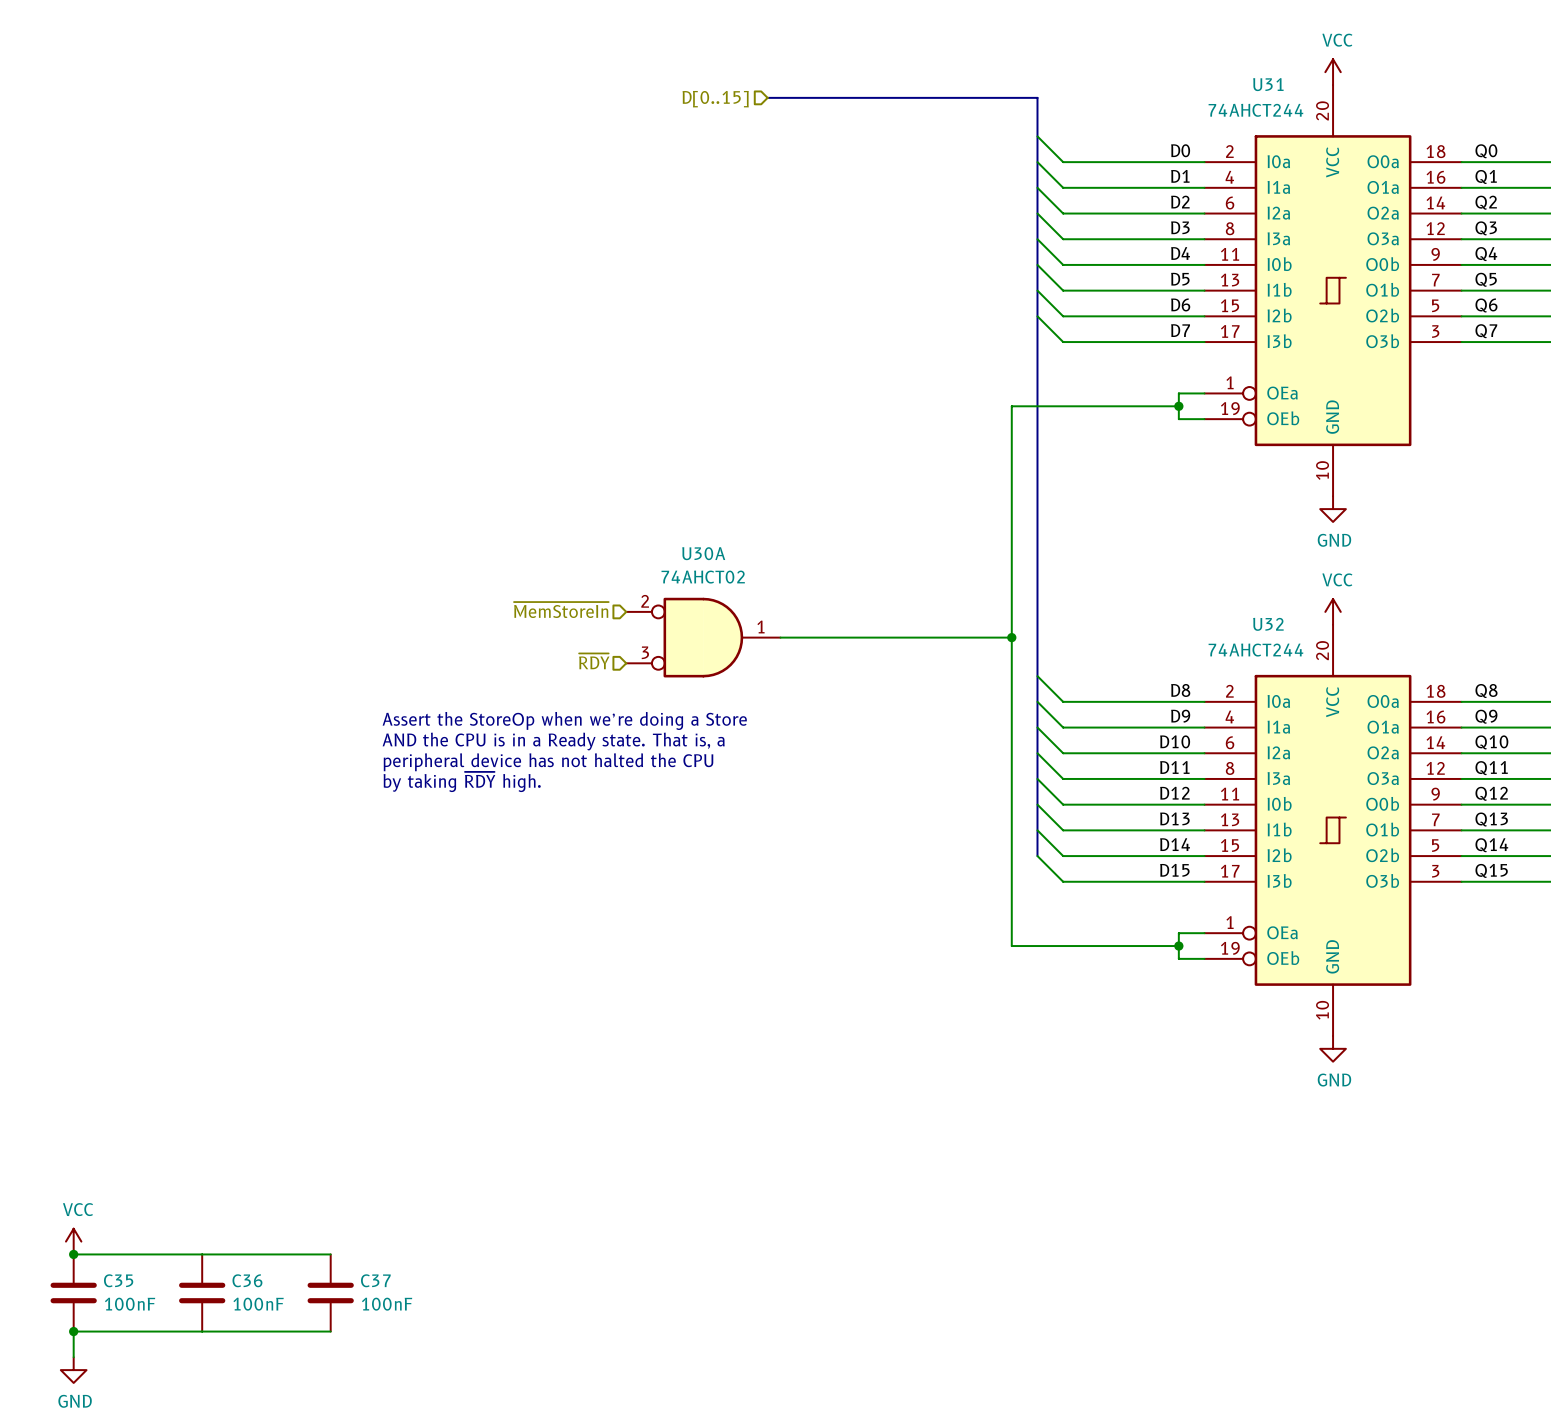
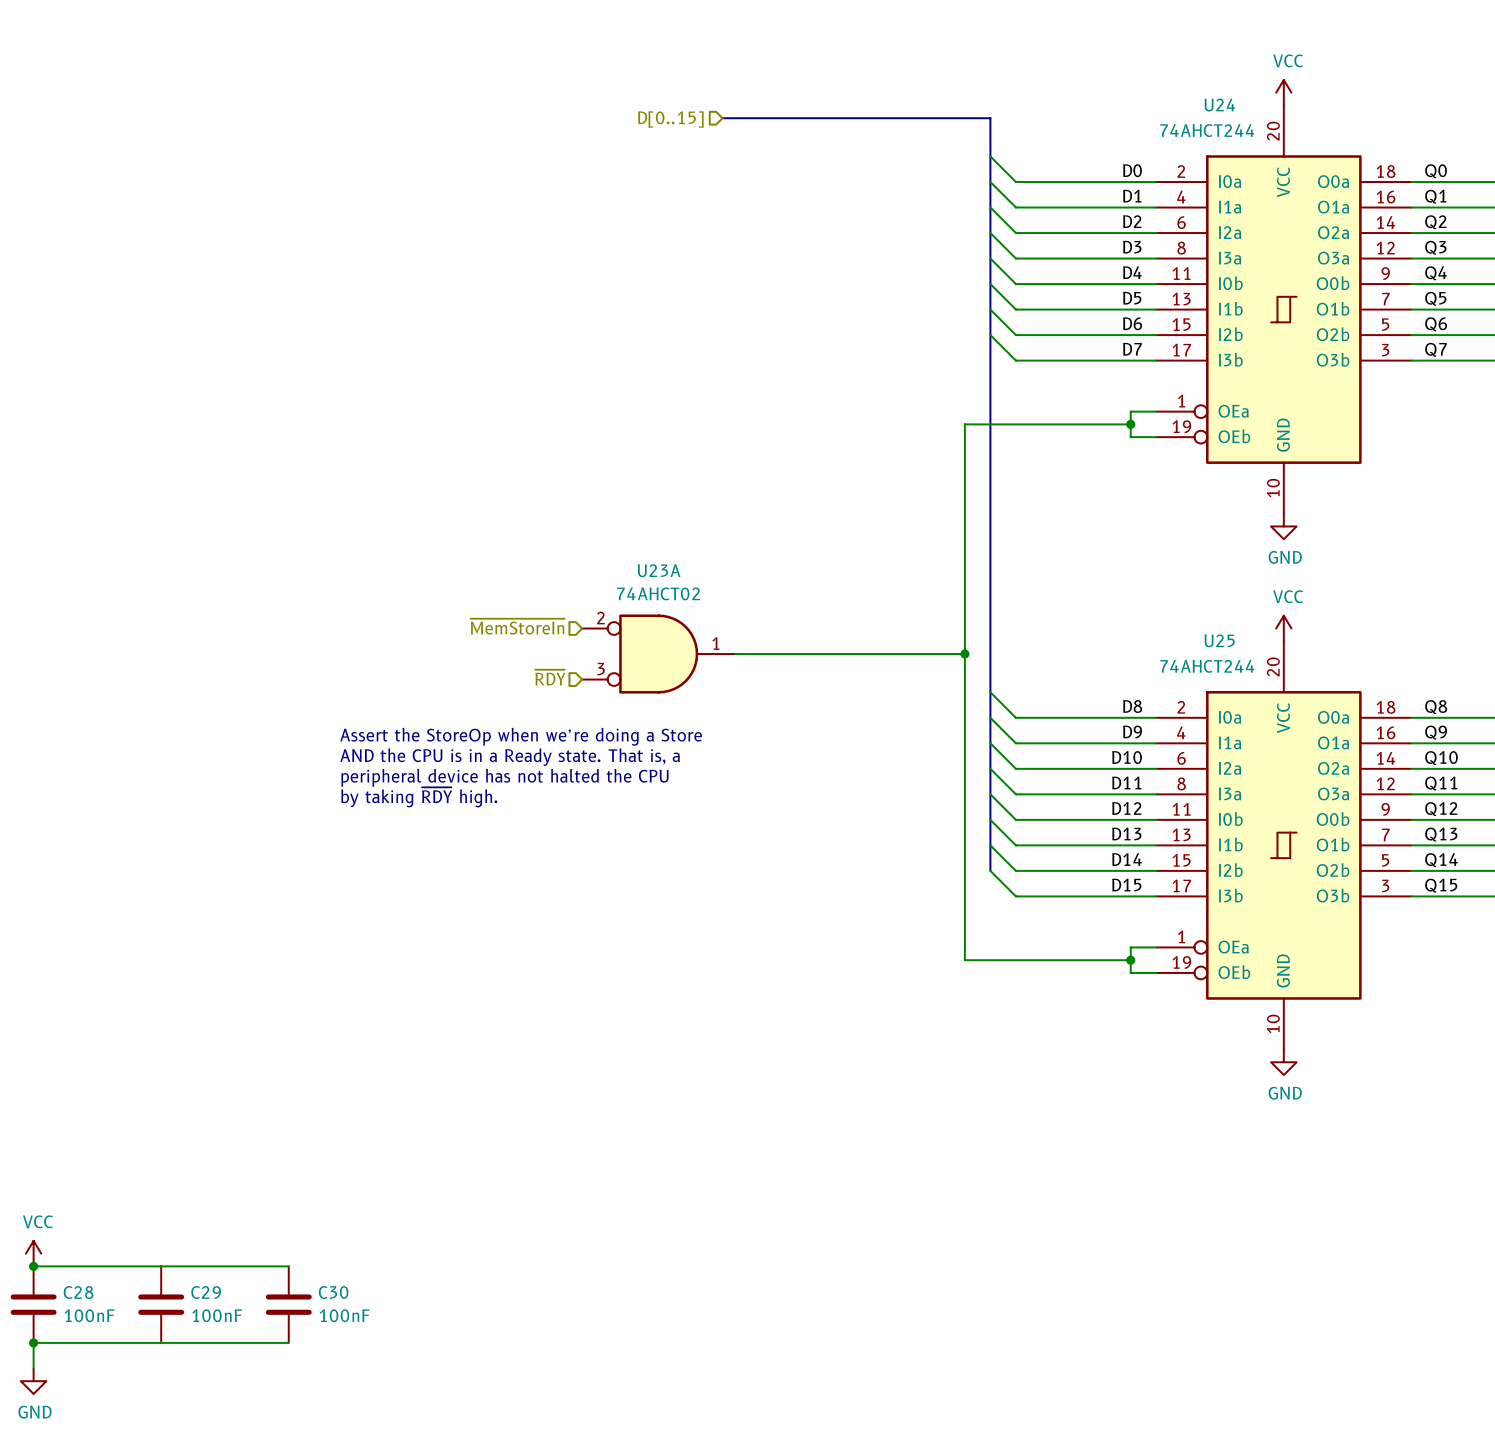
U31 name: U31 (1268, 84) -> U24 (1219, 105)
U30A name: U30A (703, 553) -> U23A (659, 570)
U32 name: U32 (1268, 624) -> U25 (1219, 640)
C35 name: C35 (118, 1280) -> C28 (78, 1292)
C36 name: C36 (247, 1280) -> C29 (206, 1292)
C37 name: C37 (375, 1280) -> C30 (333, 1292)

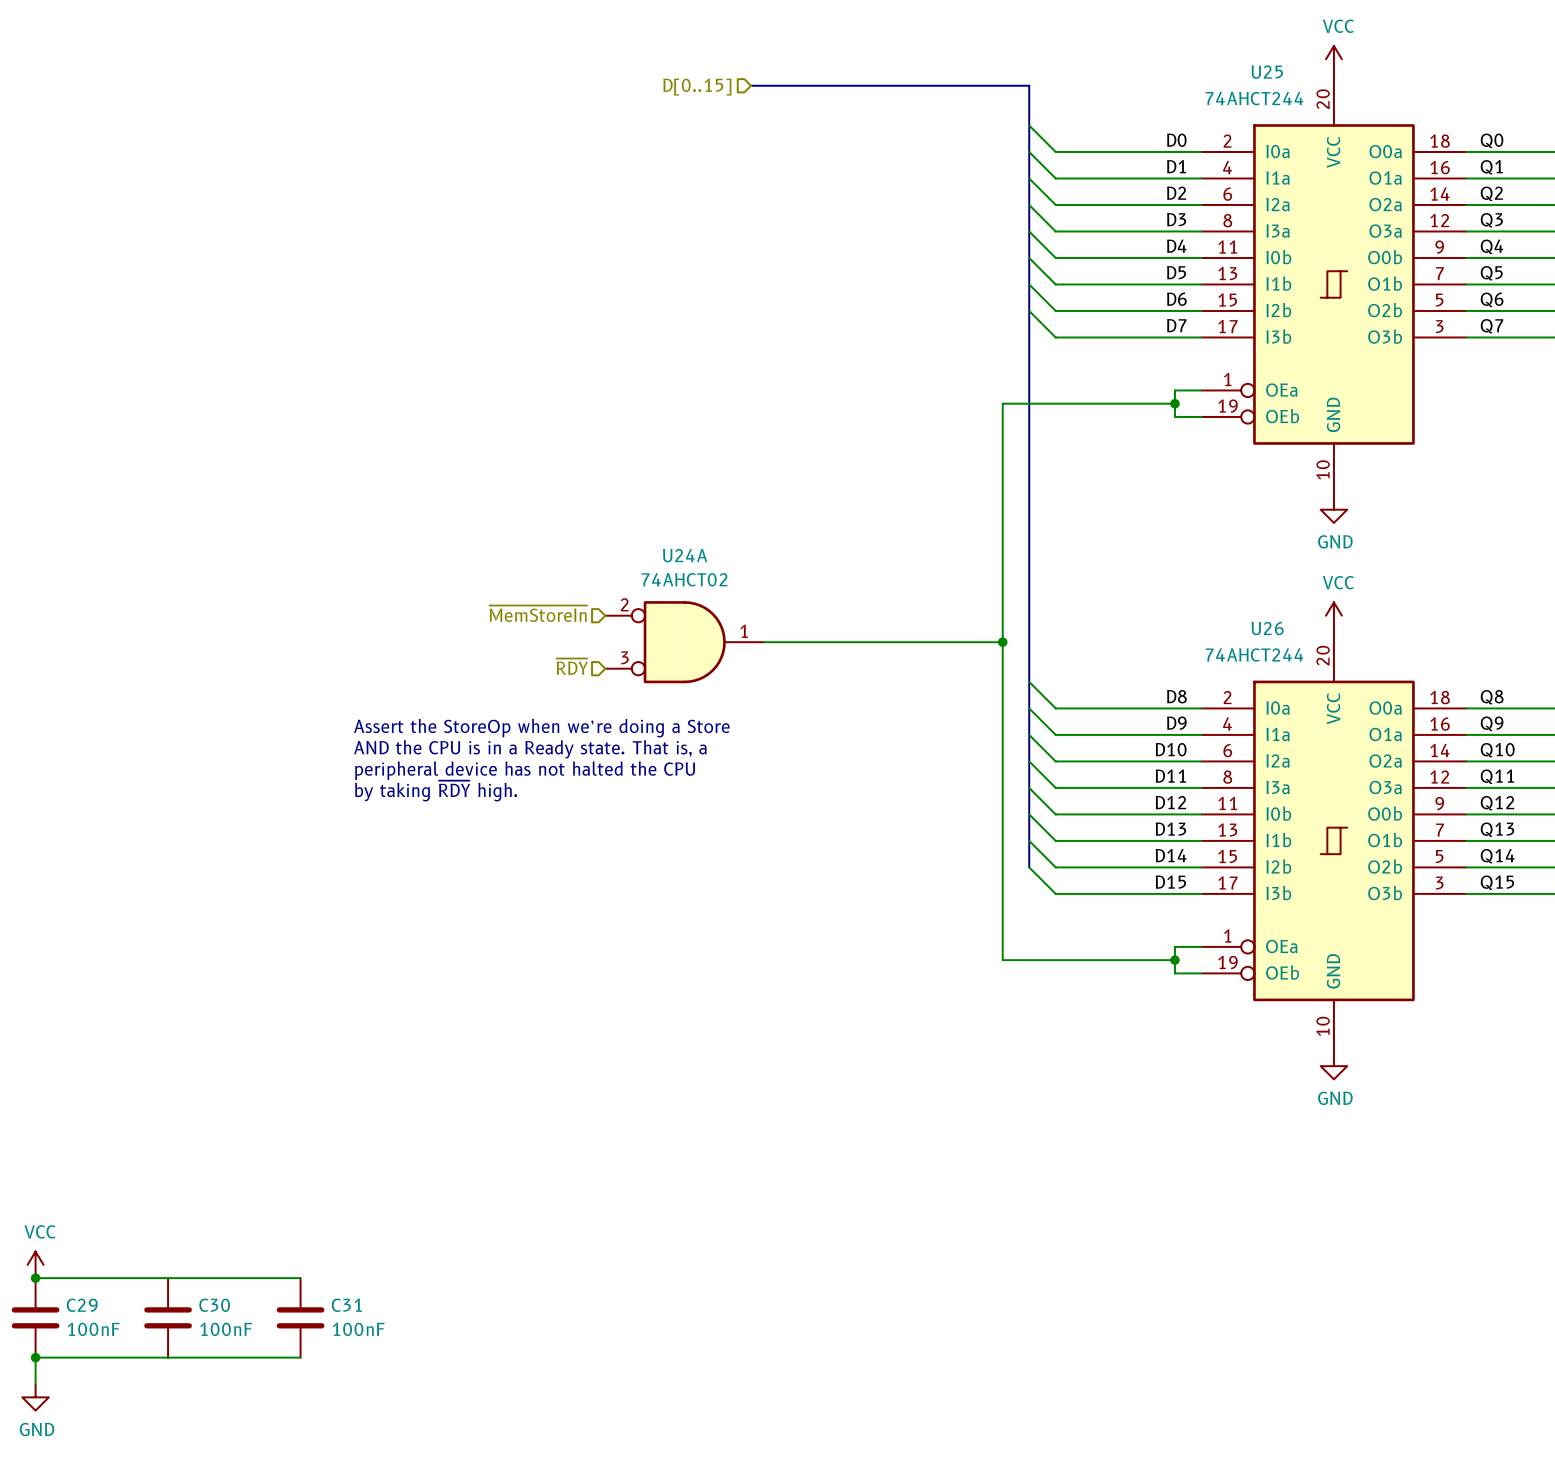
U24 name: U24 (1219, 105) -> U25 (1267, 72)
U23A name: U23A (659, 570) -> U24A (685, 555)
U25 name: U25 (1219, 640) -> U26 (1267, 628)
C28 name: C28 (78, 1292) -> C29 (82, 1305)
C29 name: C29 (206, 1292) -> C30 (214, 1305)
C30 name: C30 (333, 1292) -> C31 (346, 1305)

